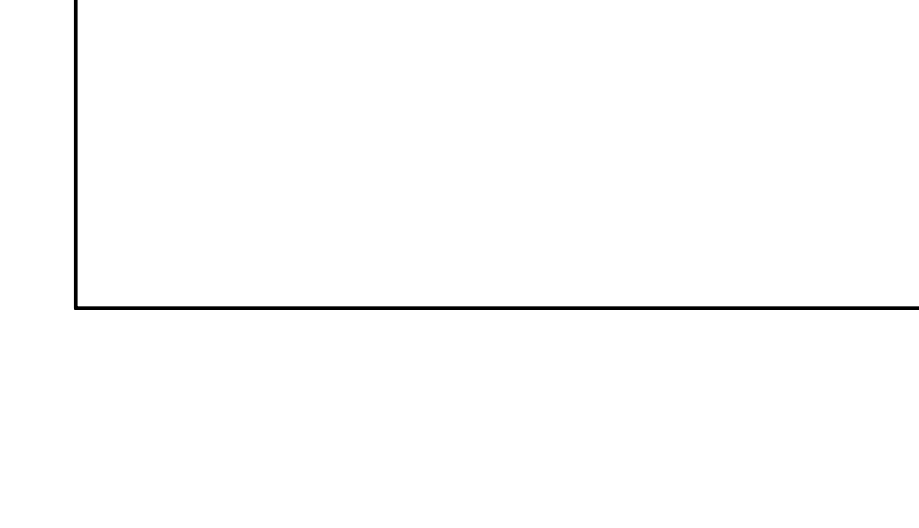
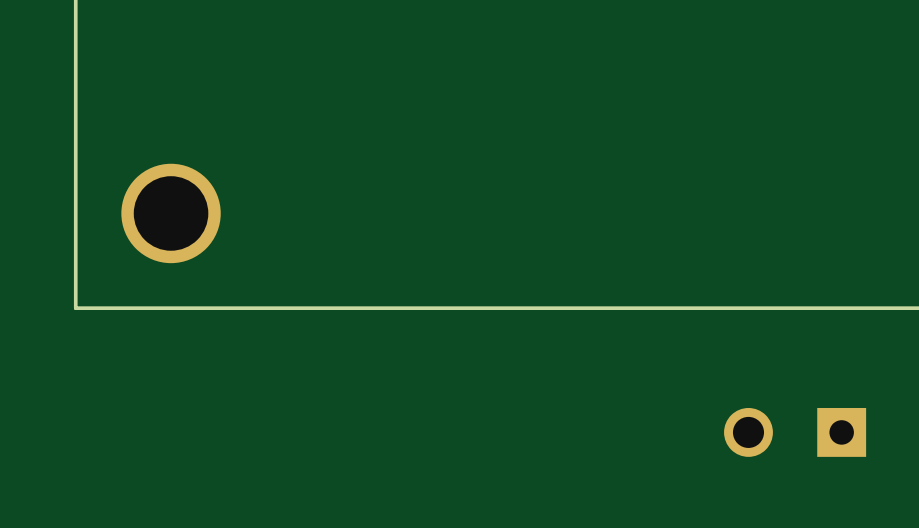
part: none -> (171, 213)
part: none -> (795, 432)

